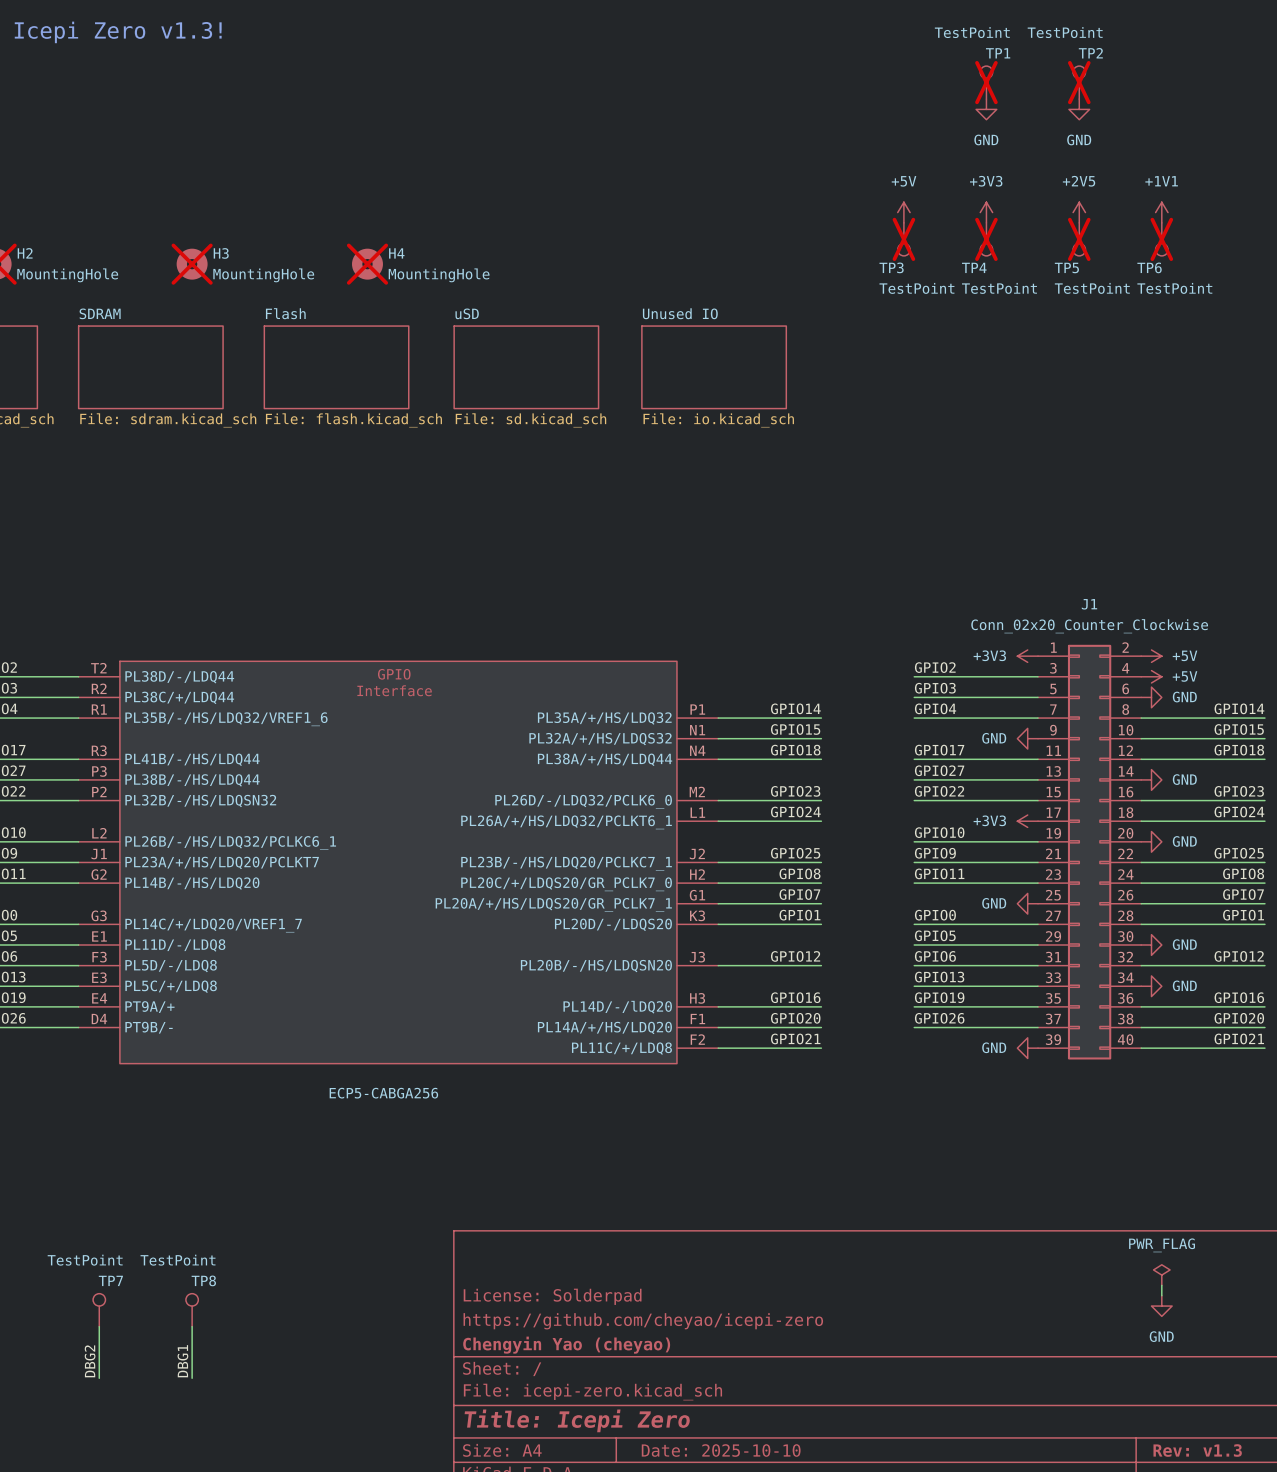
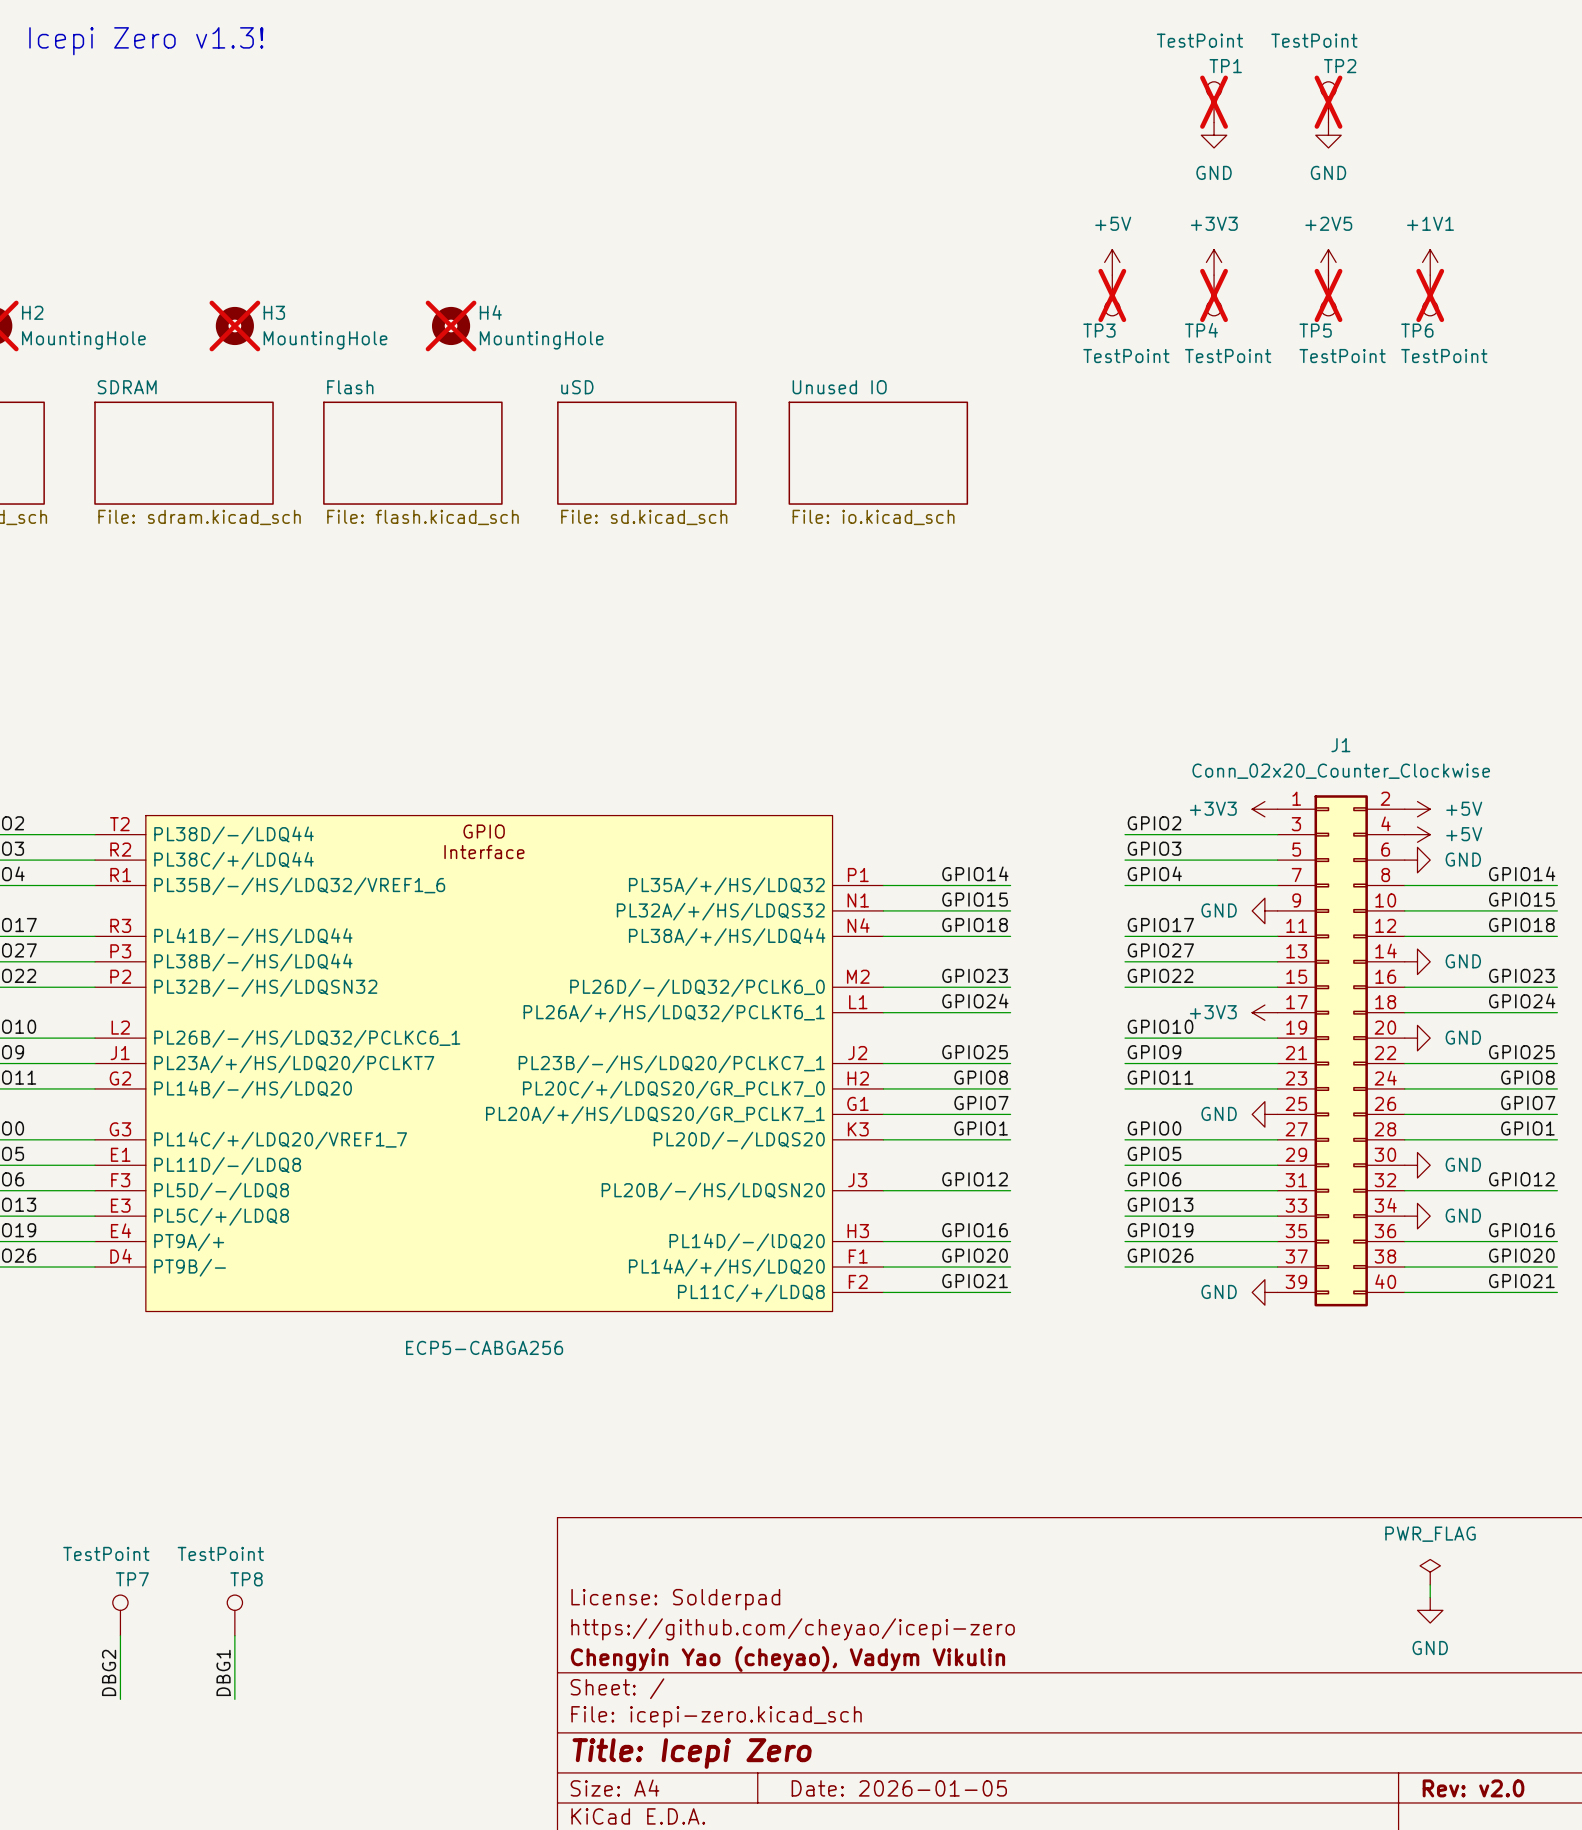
title block: Chengyin Yao (cheyao) (566, 1345) -> Chengyin Yao (cheyao), Vadym Vikulin (787, 1659)
title block: Date: 2025-10-10 (721, 1450) -> Date: 2026-01-05 (899, 1788)
title block: Rev: v1.3 (1197, 1450) -> Rev: v2.0 (1473, 1788)

